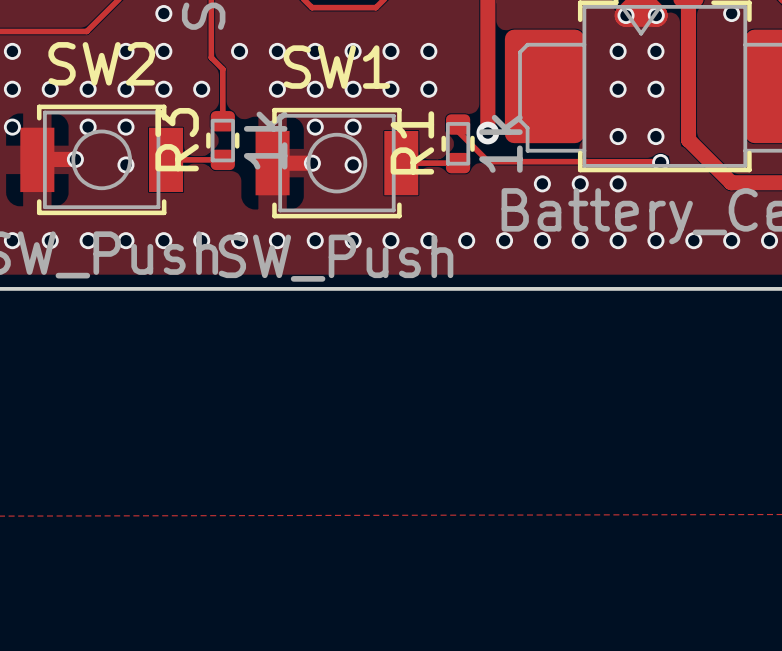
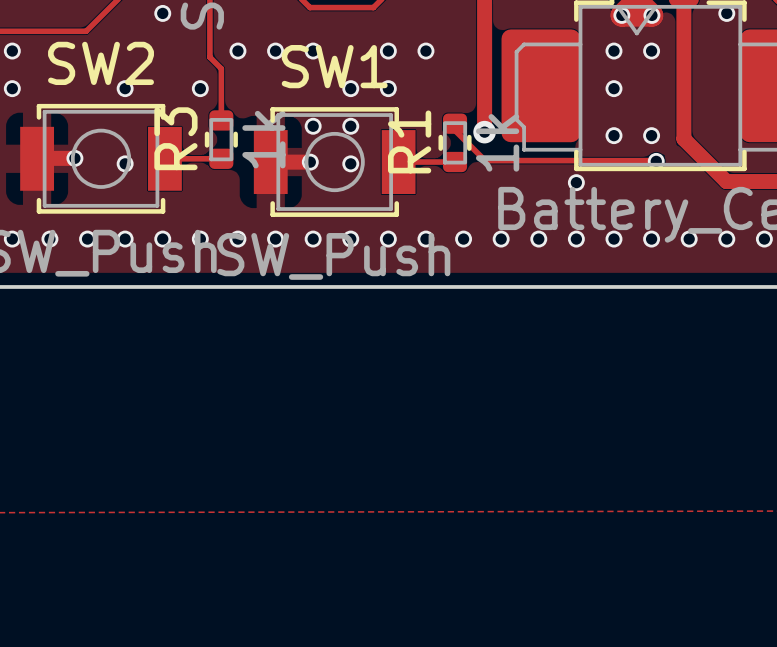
via: (125, 51) -> none
via: (163, 51) -> none
via: (353, 51) -> none
via: (50, 89) -> none
via: (88, 89) -> none
via: (163, 89) -> none
via: (277, 89) -> none
via: (315, 89) -> none
via: (428, 89) -> none
via: (655, 89) -> none
via: (12, 127) -> none
via: (88, 127) -> none
via: (125, 127) -> none
via: (542, 183) -> none
via: (618, 183) -> none

